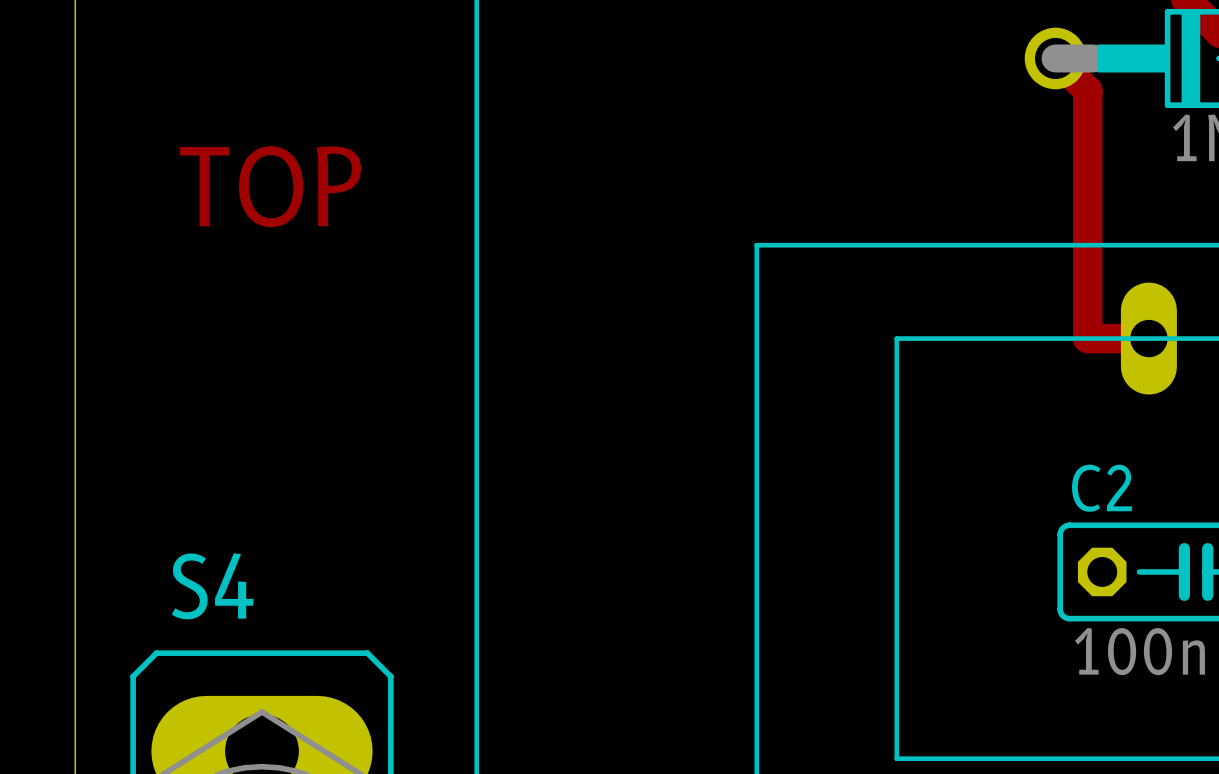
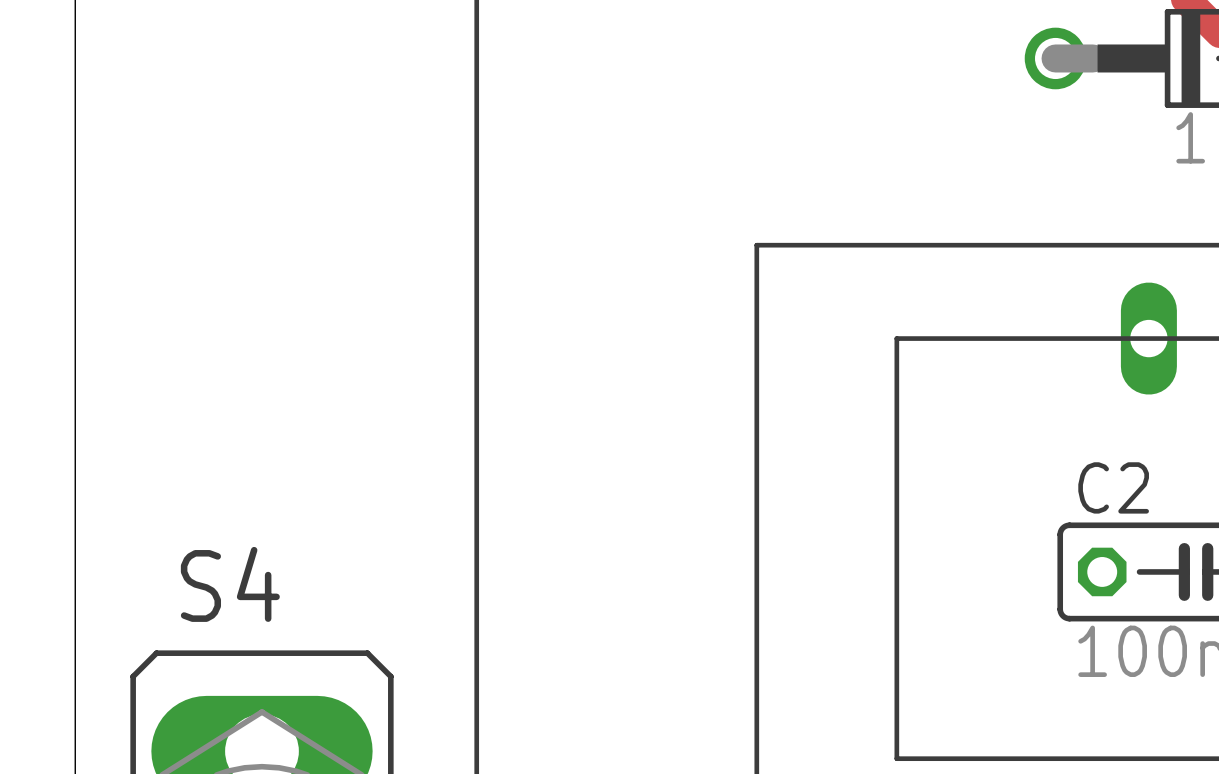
track: (1055, 58) (1087, 90) (1087, 338) (1148, 338) -> none
text: TOP (270, 186) -> none

